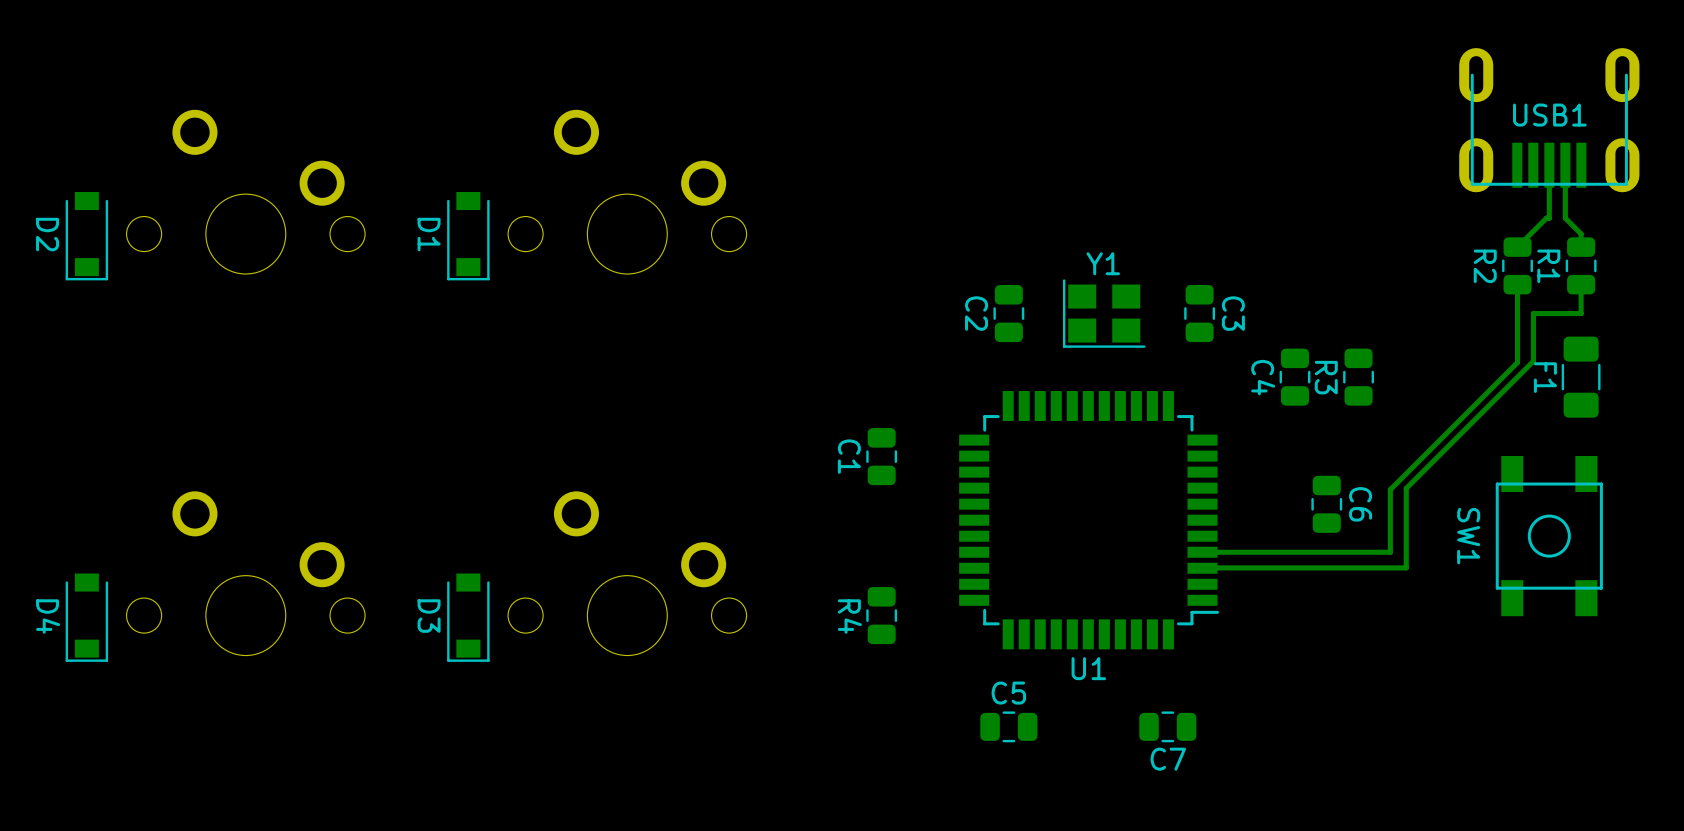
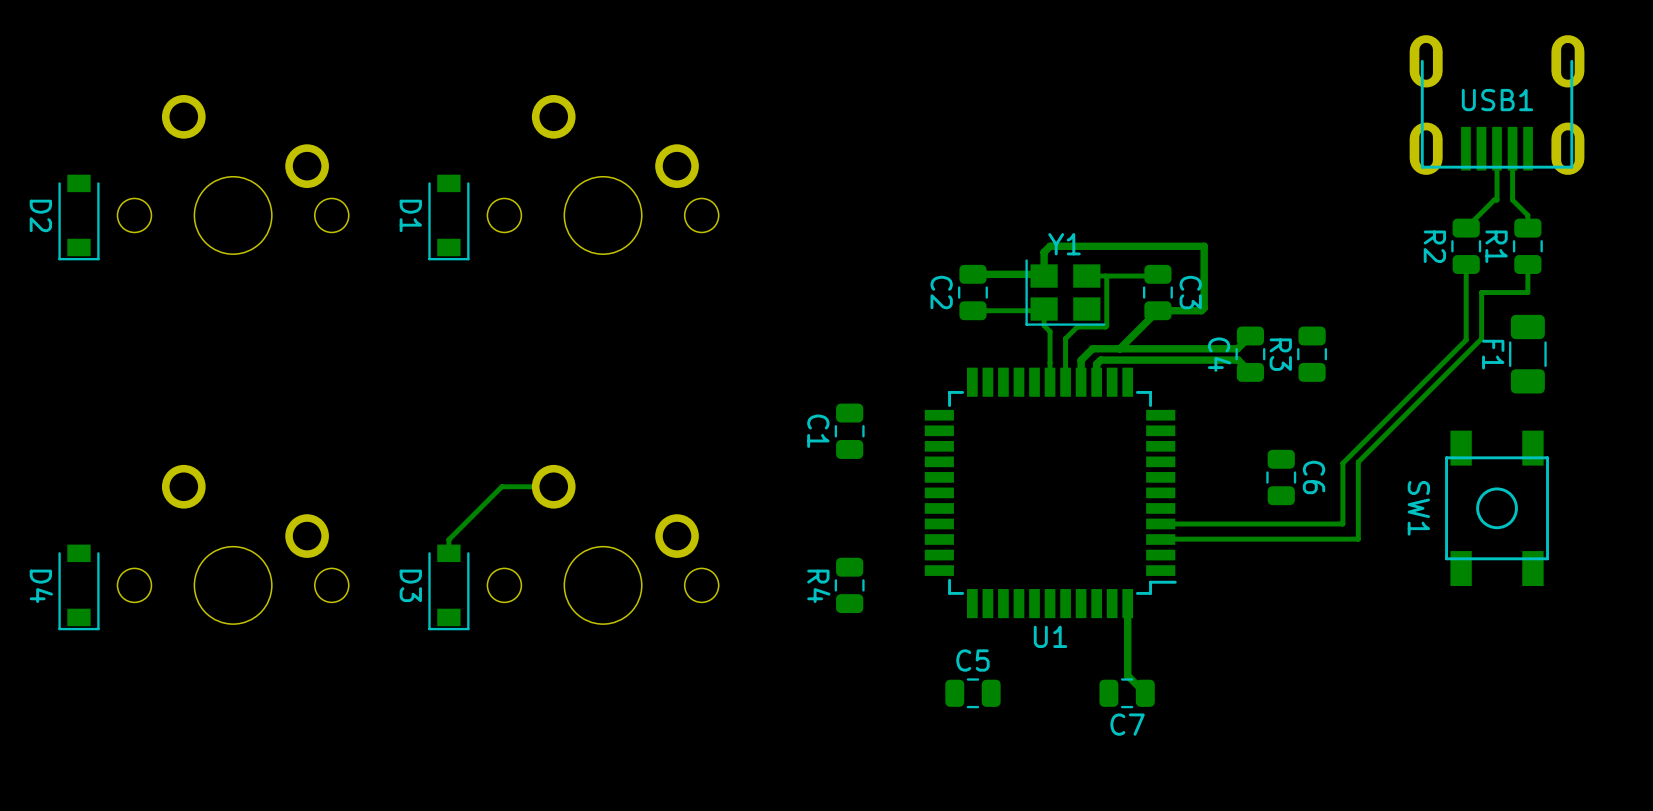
bottom track: none -> (972, 274) (1042, 274) (1044, 276) (1044, 252) (1050, 246) (1204, 246) (1204, 307) (1201, 310) (1157, 310) (1119, 348)
bottom track: none -> (1157, 274) (1156, 276) (1086, 276)
bottom track: none -> (1105, 276) (1106, 325) (1077, 327) (1065, 338) (1065, 382)
bottom track: none -> (972, 310) (1042, 310) (1044, 309) (1044, 325) (1050, 331) (1050, 382)
bottom track: none -> (1250, 335) (1237, 348) (1092, 348) (1081, 360) (1081, 382)
bottom track: none -> (1250, 372) (1238, 360) (1100, 360) (1096, 364) (1096, 382)
bottom track: none -> (553, 486) (501, 486) (448, 539) (448, 553)
bottom track: none -> (1127, 603) (1127, 675) (1145, 693)

